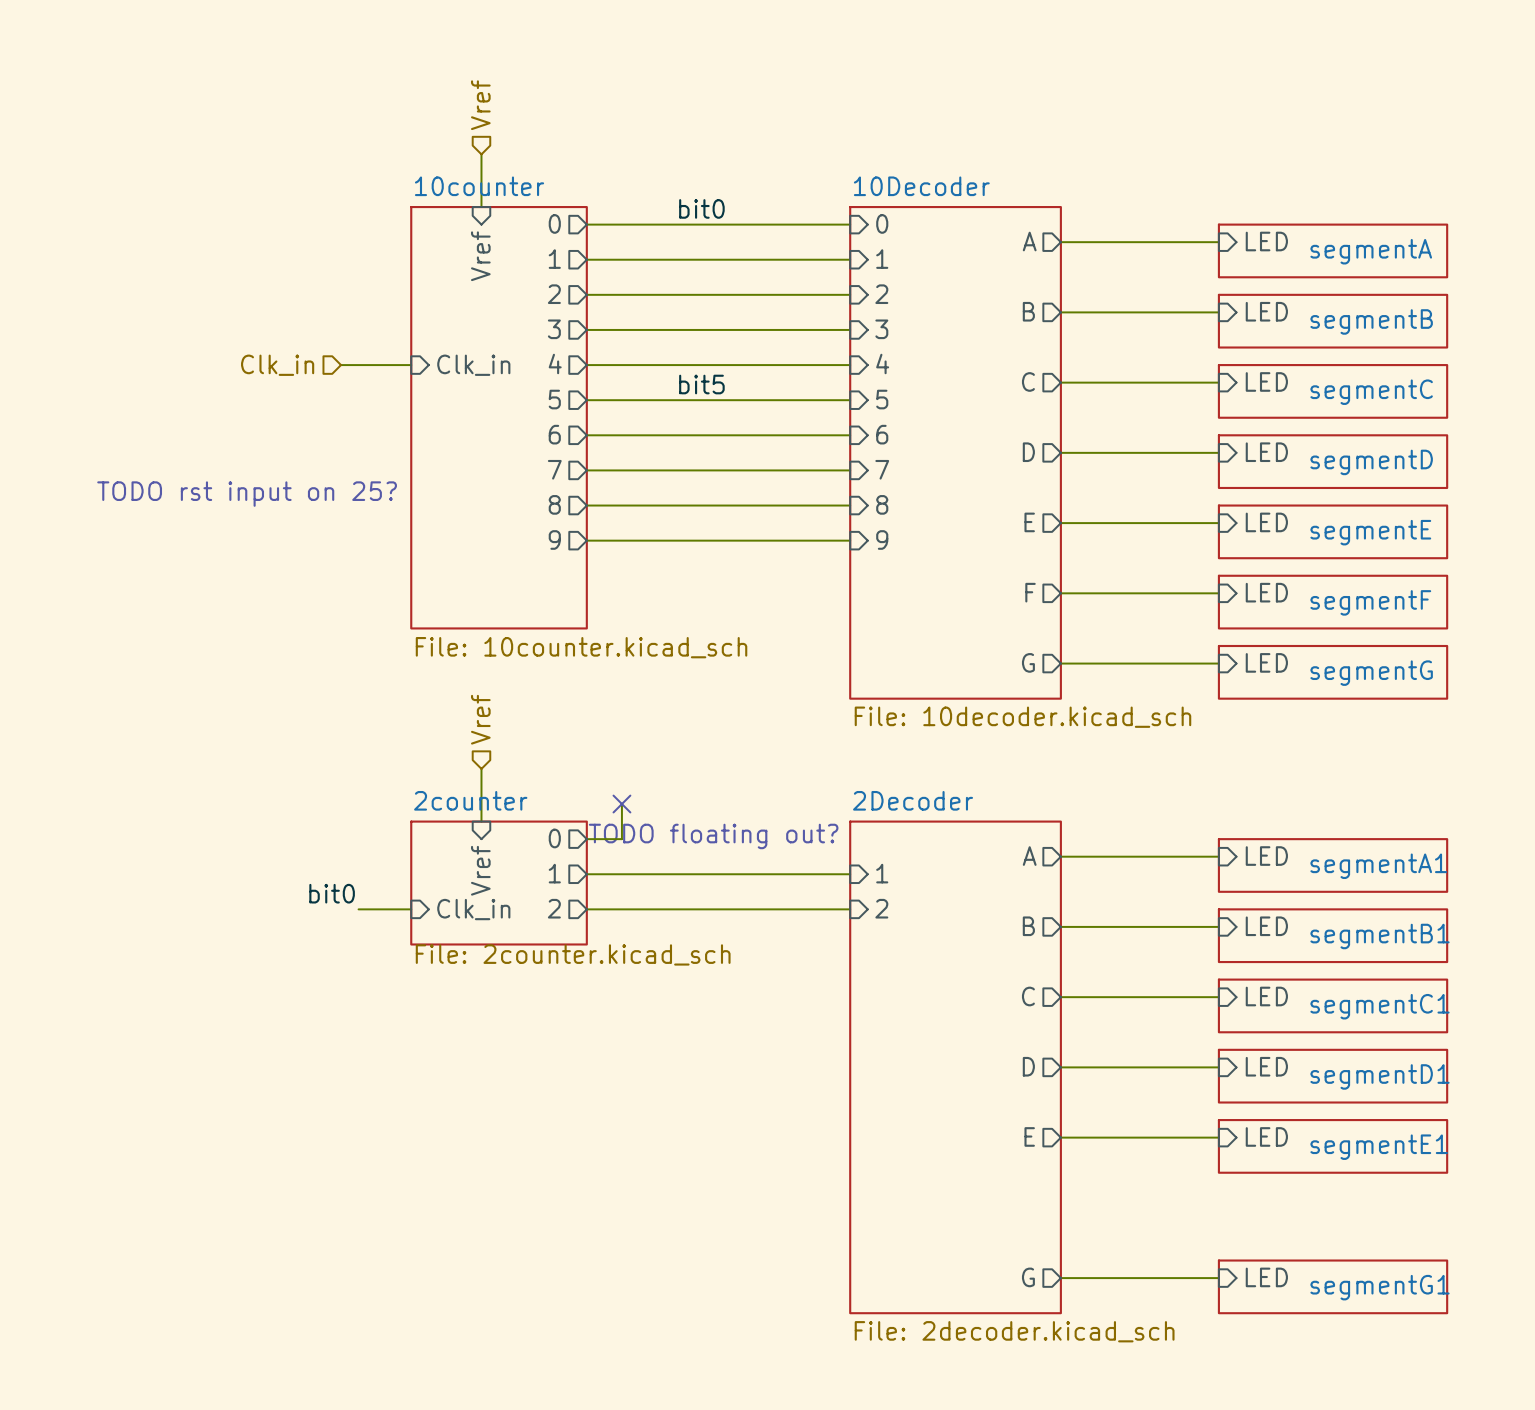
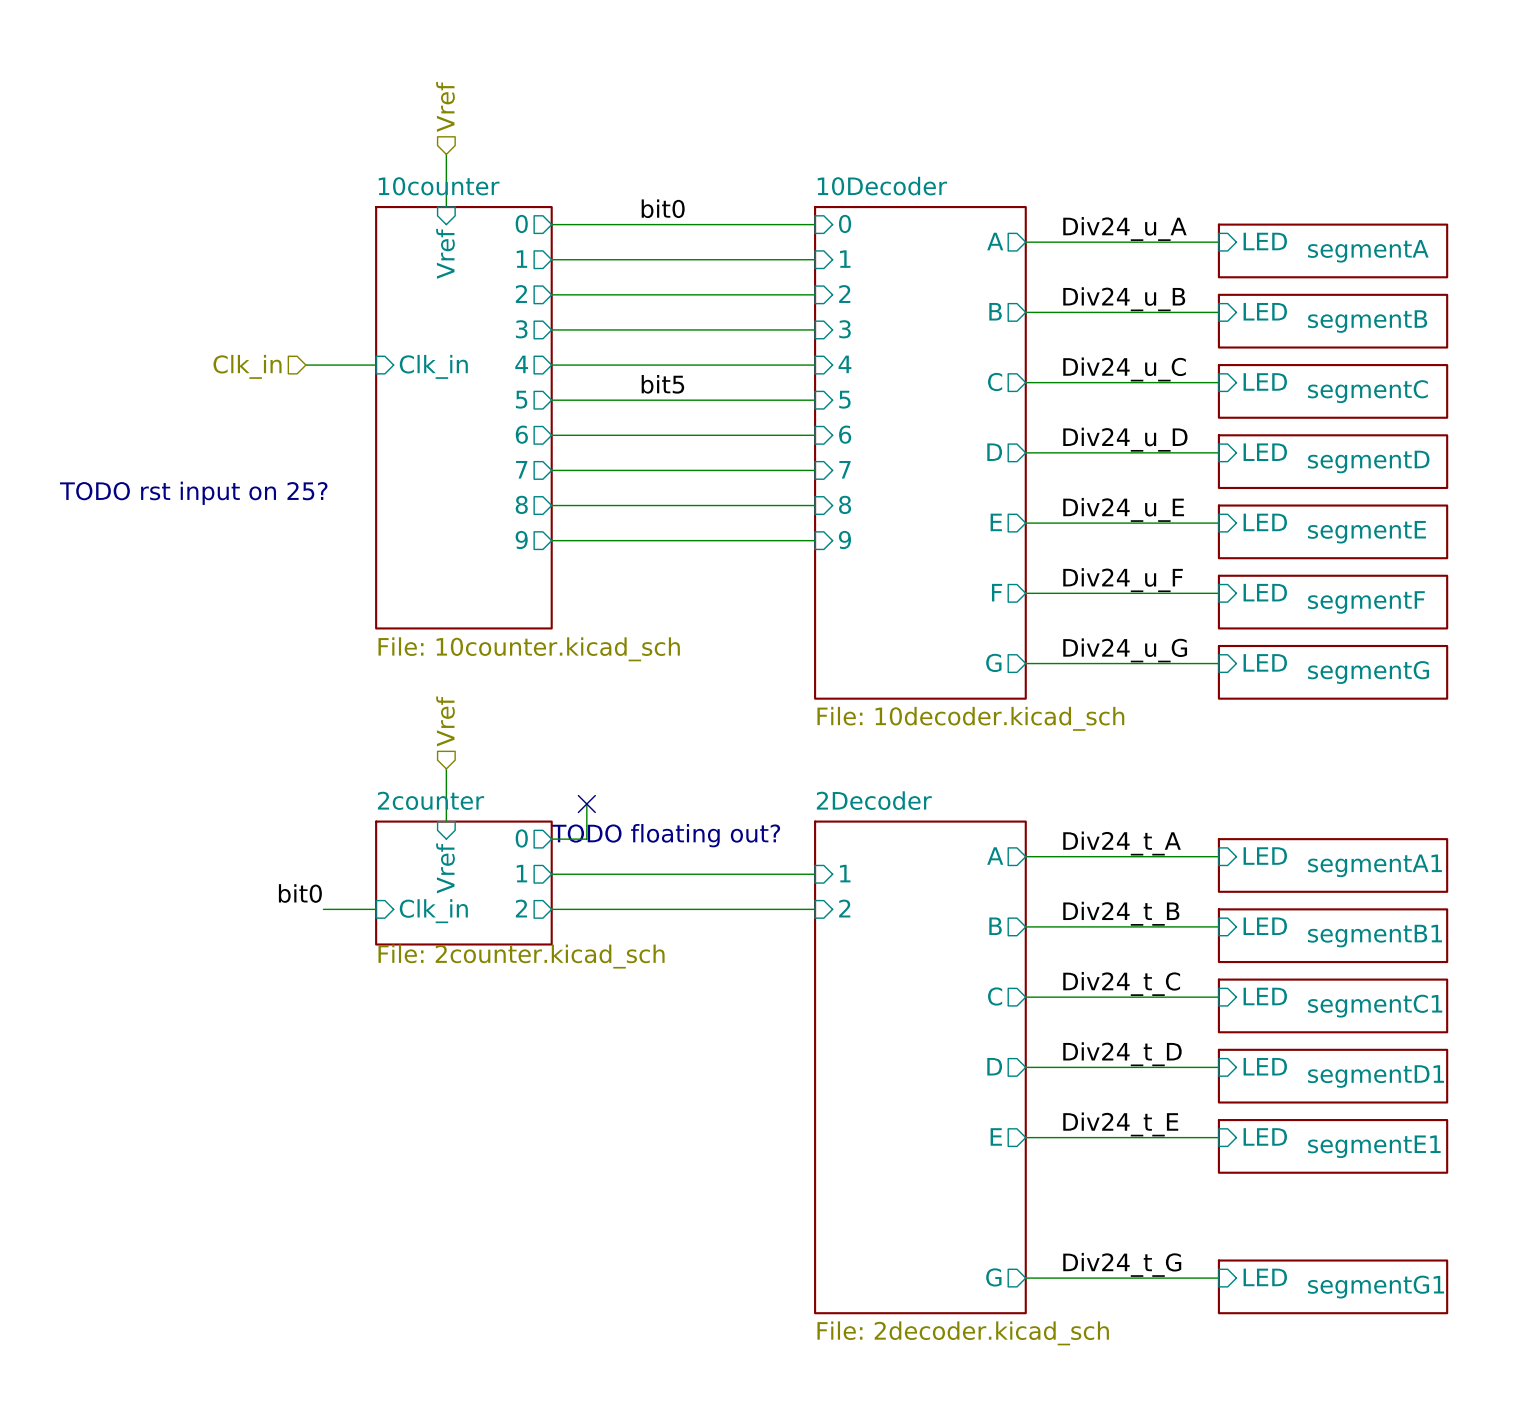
hierarchical label position: Vref (480, 105) -> Vref (445, 106)
wire: (481, 154) (481, 207) -> (446, 154) (446, 207)
label position: bit0 (701, 208) -> bit0 (663, 208)
sheet pin position: 0 (554, 223) -> 0 (521, 223)
sheet pin position: 0 (882, 223) -> 0 (845, 223)
wire: (815, 224) (850, 224) -> (551, 224) (586, 224)
label: none -> Div24_u_A (1124, 228)
sheet pin position: A (1029, 241) -> A (995, 241)
wire: none -> (1025, 242) (1060, 242)
sheet pin position: Vref (480, 256) -> Vref (445, 253)
sheet pin position: 1 (554, 259) -> 1 (521, 259)
wire: (815, 259) (850, 259) -> (551, 259) (586, 259)
sheet pin position: 1 (882, 259) -> 1 (845, 259)
sheet pin position: 2 (554, 294) -> 2 (521, 294)
wire: (815, 294) (850, 294) -> (551, 294) (586, 294)
sheet pin position: 2 (881, 294) -> 2 (844, 294)
label: none -> Div24_u_B (1124, 299)
sheet pin position: B (1028, 311) -> B (995, 311)
wire: none -> (1025, 312) (1060, 312)
sheet pin position: 3 (554, 329) -> 3 (521, 329)
wire: (815, 329) (850, 329) -> (551, 329) (586, 329)
sheet pin position: 3 (881, 329) -> 3 (844, 329)
sheet pin position: 4 (555, 363) -> 4 (521, 364)
sheet pin position: 4 (882, 363) -> 4 (844, 364)
hierarchical label position: Clk_in (277, 365) -> Clk_in (247, 366)
wire: (376, 365) (411, 365) -> (305, 365) (341, 365)
sheet pin position: Clk_in (473, 365) -> Clk_in (433, 366)
wire: (815, 365) (850, 365) -> (551, 365) (586, 365)
label: none -> Div24_u_C (1124, 369)
sheet pin position: C (1028, 381) -> C (995, 381)
wire: none -> (1025, 382) (1060, 382)
label position: bit5 (701, 384) -> bit5 (662, 384)
sheet pin position: 5 (554, 399) -> 5 (521, 399)
sheet pin position: 5 (882, 399) -> 5 (844, 399)
wire: (815, 400) (850, 400) -> (551, 400) (586, 400)
sheet 10counter position: (499, 417) -> (463, 417)
sheet pin position: 6 (554, 434) -> 6 (521, 434)
sheet pin position: 6 (882, 434) -> 6 (845, 434)
wire: (815, 435) (850, 435) -> (551, 435) (586, 435)
label: none -> Div24_u_D (1125, 439)
sheet 10Decoder position: (955, 452) -> (920, 452)
wire: none -> (1025, 452) (1060, 452)
sheet pin position: D (1028, 452) -> D (994, 452)
sheet pin position: 7 (554, 469) -> 7 (521, 469)
sheet pin position: 7 (882, 469) -> 7 (845, 469)
wire: (815, 470) (850, 470) -> (551, 470) (586, 470)
text position: TODO rst input on 25? (247, 494) -> TODO rst input on 25? (193, 493)
sheet pin position: 8 (554, 504) -> 8 (521, 504)
sheet pin position: 8 (882, 504) -> 8 (845, 504)
wire: (815, 505) (850, 505) -> (551, 505) (586, 505)
label: none -> Div24_u_E (1123, 509)
sheet pin position: E (1029, 522) -> E (996, 522)
wire: none -> (1025, 523) (1060, 523)
sheet pin position: 9 (554, 539) -> 9 (521, 540)
sheet pin position: 9 (882, 539) -> 9 (844, 540)
wire: (815, 540) (850, 540) -> (551, 540) (586, 540)
label: none -> Div24_u_F (1123, 580)
sheet pin position: F (1030, 592) -> F (997, 592)
wire: none -> (1025, 593) (1060, 593)
label: none -> Div24_u_G (1125, 650)
sheet pin position: G (1028, 662) -> G (993, 662)
wire: none -> (1025, 663) (1060, 663)
hierarchical label position: Vref (480, 719) -> Vref (445, 721)
wire: (481, 768) (481, 821) -> (446, 768) (446, 821)
wire: (621, 804) (621, 839) (586, 839) -> (586, 804) (586, 839) (551, 839)
no-connect mark position: (621, 804) -> (586, 804)
text position: TODO floating out? (713, 836) -> TODO floating out? (665, 835)
sheet pin position: 0 (554, 838) -> 0 (521, 838)
label: none -> Div24_t_A (1122, 843)
wire: none -> (1025, 856) (1060, 856)
sheet pin position: A (1029, 856) -> A (995, 856)
sheet pin position: Vref (480, 870) -> Vref (445, 868)
sheet pin position: 1 (554, 873) -> 1 (521, 873)
sheet pin position: 1 (882, 873) -> 1 (845, 873)
wire: (815, 874) (850, 874) -> (551, 874) (586, 874)
sheet 2counter position: (499, 883) -> (463, 883)
label position: bit0 (332, 893) -> bit0 (300, 893)
sheet pin position: 2 (554, 908) -> 2 (521, 908)
sheet pin position: 2 (881, 908) -> 2 (844, 908)
wire: (376, 909) (411, 909) -> (323, 909) (358, 909)
sheet pin position: Clk_in (473, 909) -> Clk_in (433, 911)
wire: (815, 909) (850, 909) -> (551, 909) (586, 909)
label: none -> Div24_t_B (1121, 913)
wire: none -> (1025, 926) (1060, 926)
sheet pin position: B (1028, 926) -> B (995, 926)
label: none -> Div24_t_C (1121, 983)
sheet pin position: C (1028, 996) -> C (995, 996)
wire: none -> (1025, 997) (1060, 997)
label: none -> Div24_t_D (1122, 1054)
sheet pin position: D (1028, 1066) -> D (994, 1066)
sheet 2Decoder position: (955, 1067) -> (920, 1067)
wire: none -> (1025, 1067) (1060, 1067)
label: none -> Div24_t_E (1120, 1124)
sheet pin position: E (1029, 1136) -> E (996, 1136)
wire: none -> (1025, 1137) (1060, 1137)
label: none -> Div24_t_G (1122, 1264)
sheet pin position: G (1028, 1277) -> G (993, 1277)
wire: none -> (1025, 1278) (1060, 1278)

